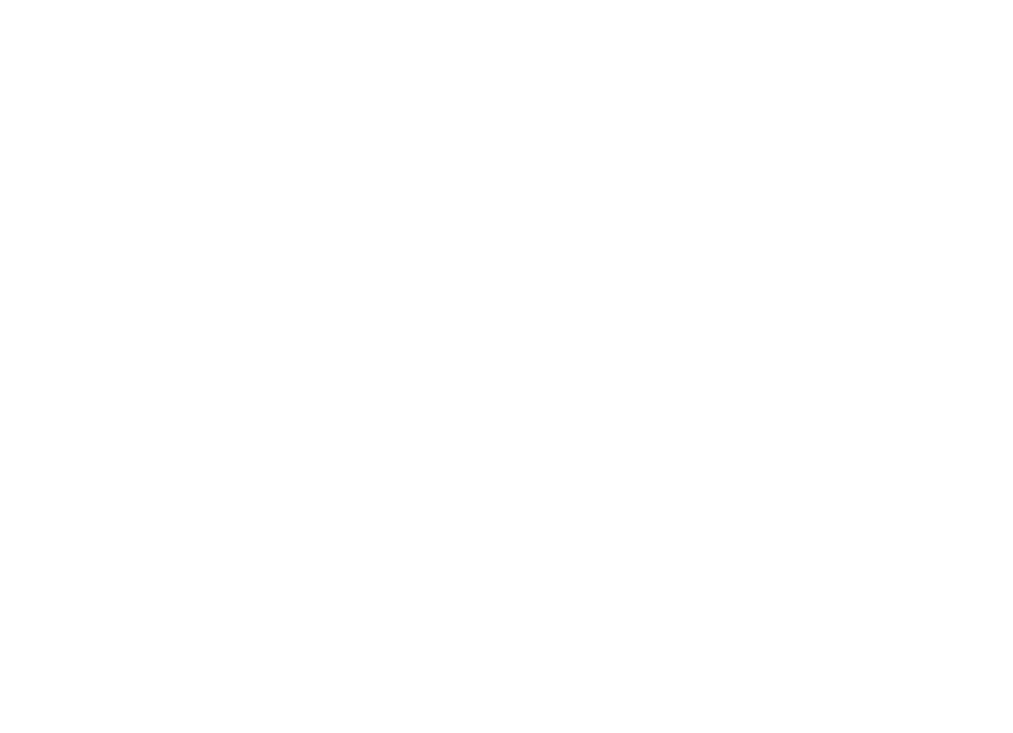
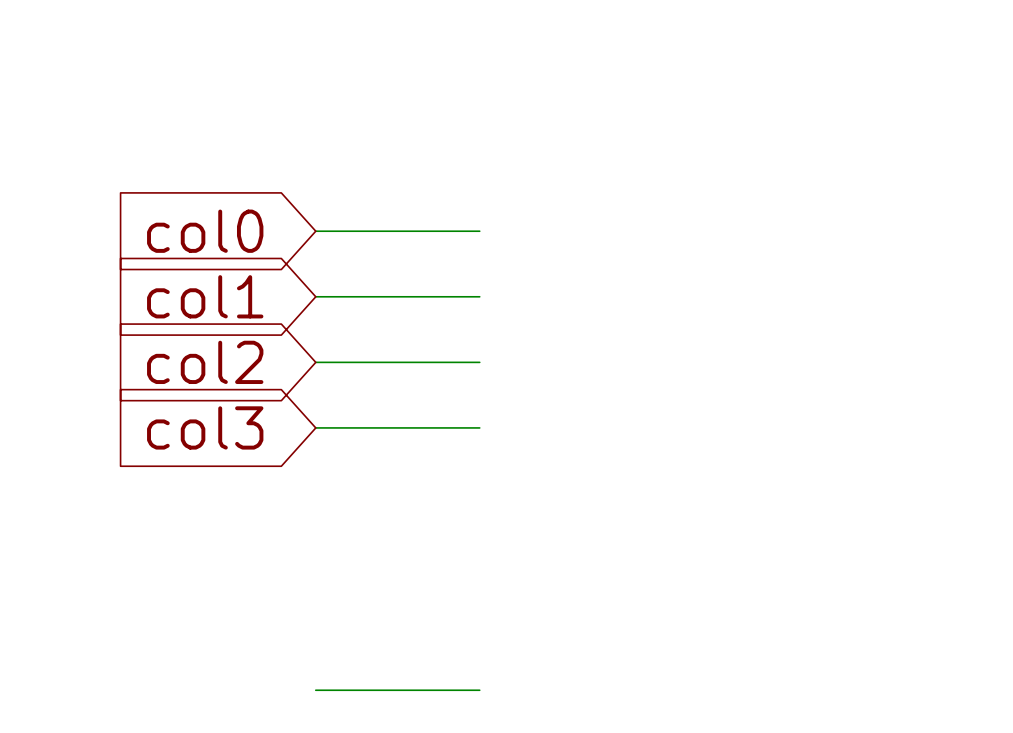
global label: none -> col0 (205, 231)
wire: none -> (315, 231) (479, 231)
global label: none -> col1 (205, 296)
wire: none -> (315, 296) (479, 296)
global label: none -> col2 (205, 362)
wire: none -> (315, 362) (479, 362)
global label: none -> col3 (205, 427)
wire: none -> (315, 427) (479, 427)
wire: none -> (315, 690) (479, 690)

